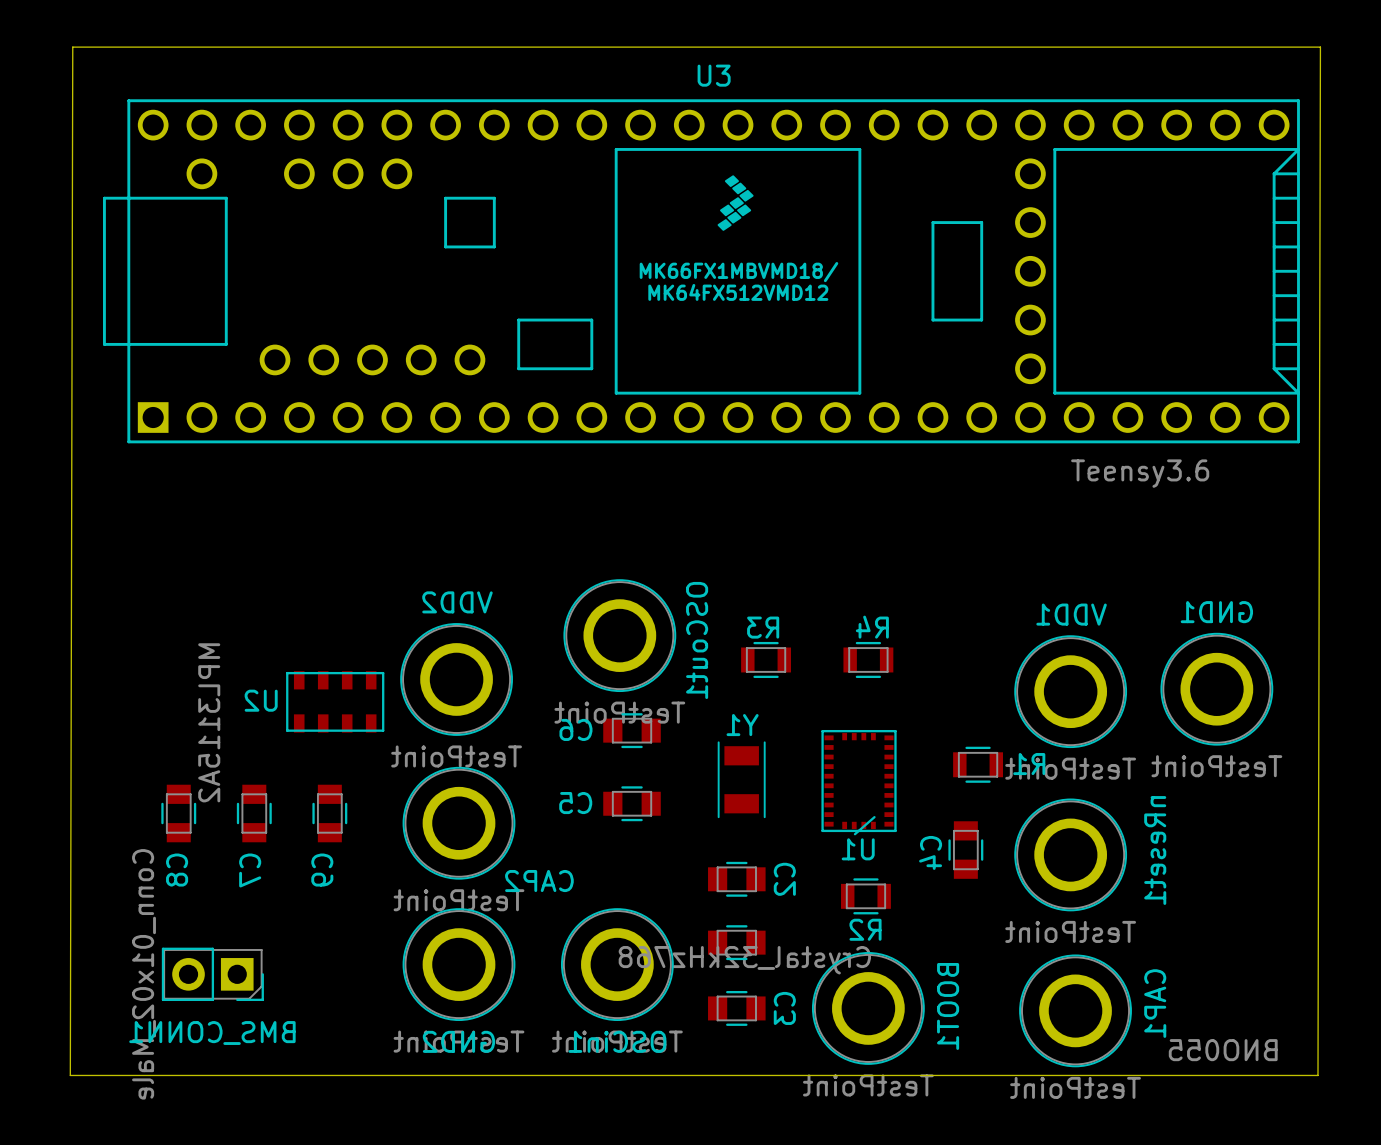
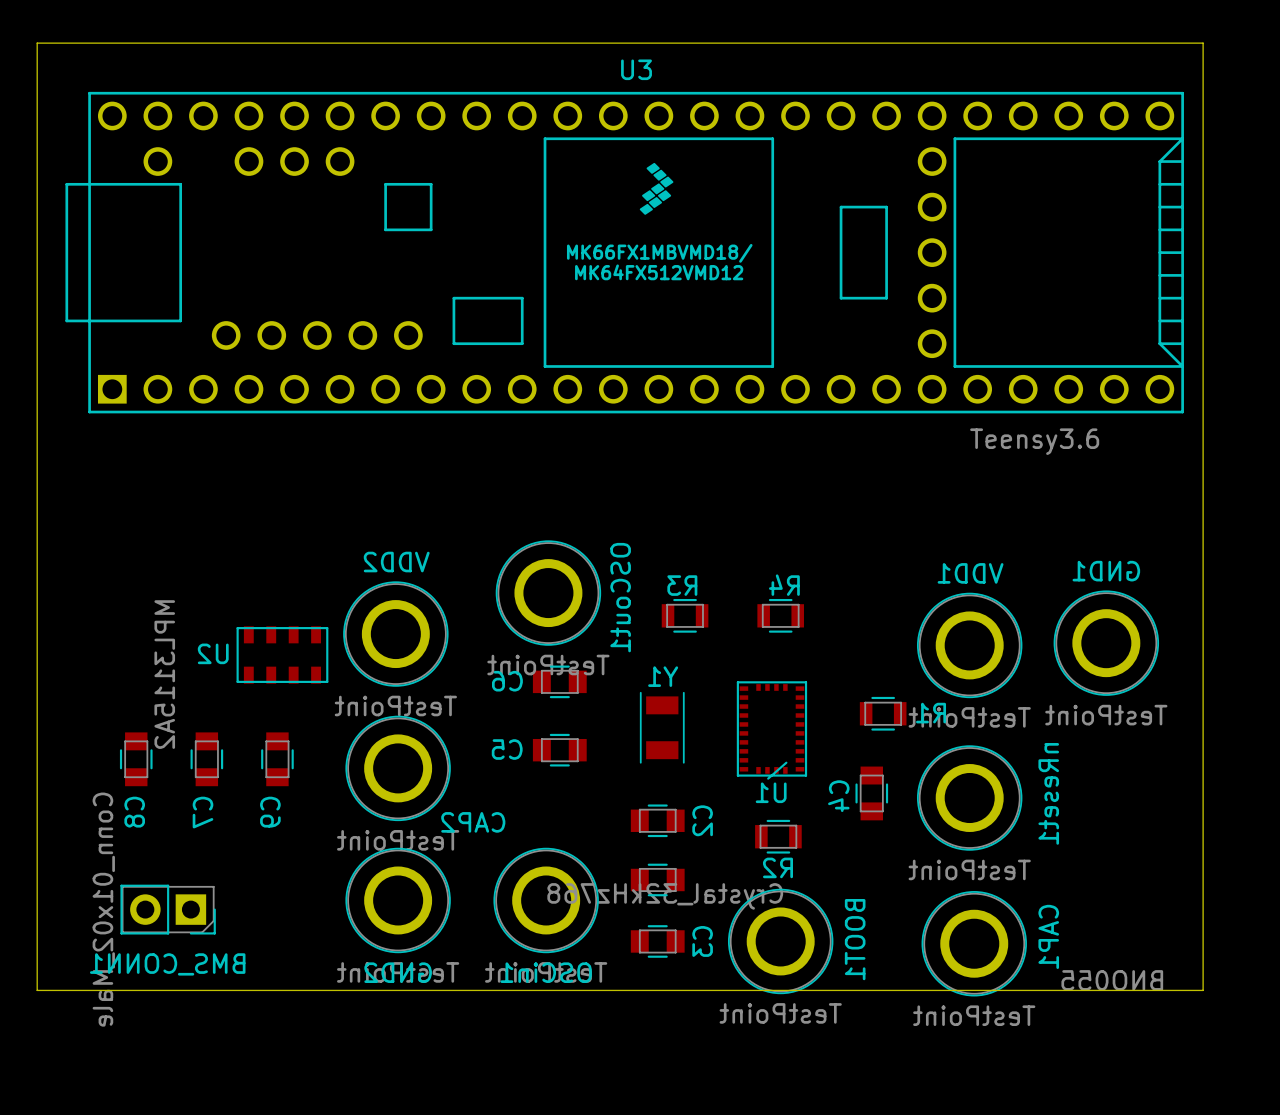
board edge: (72, 47) (70, 1075) (1317, 1075) (1320, 47) -> (37, 43) (37, 990) (1203, 990) (1203, 43)

